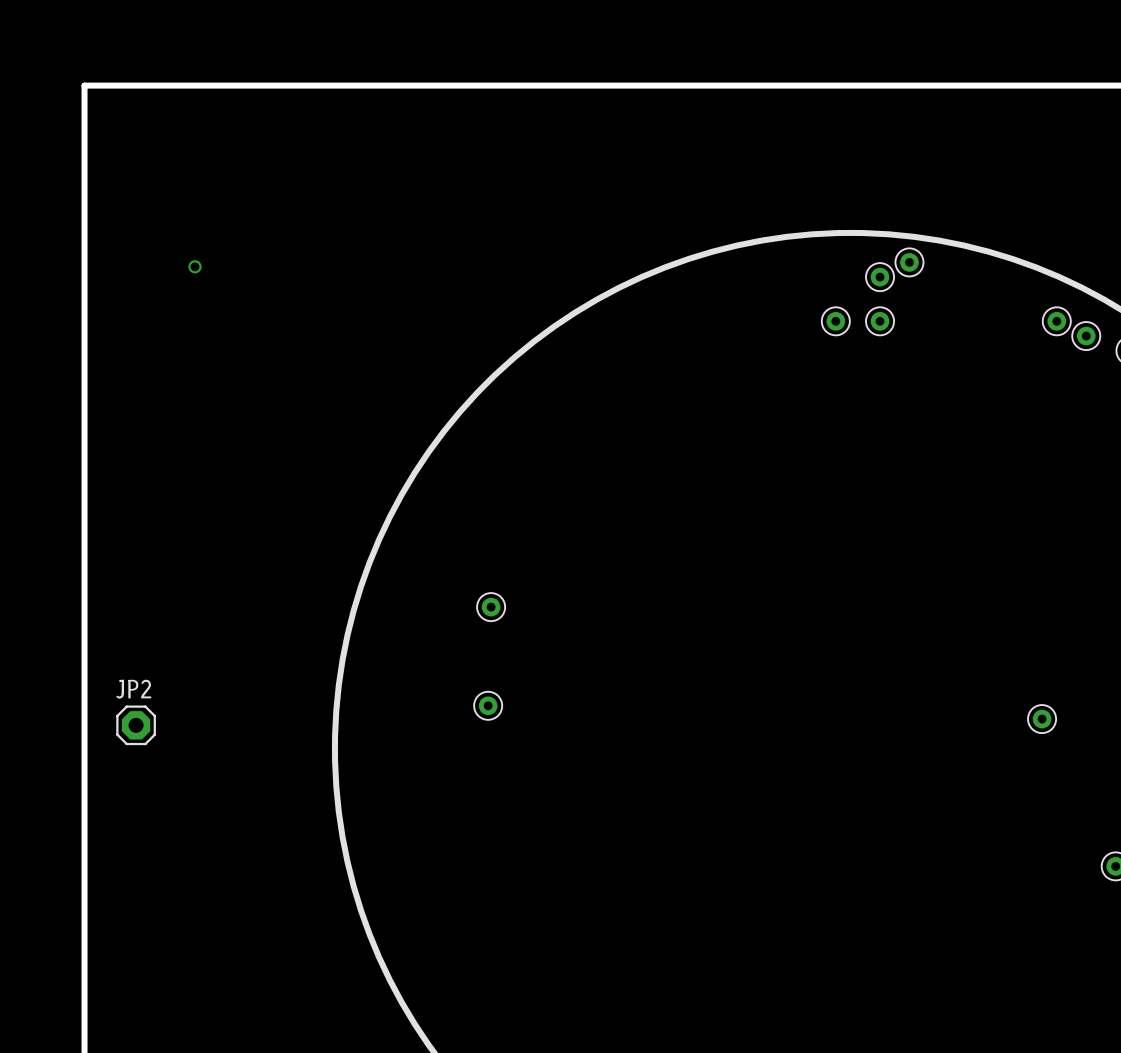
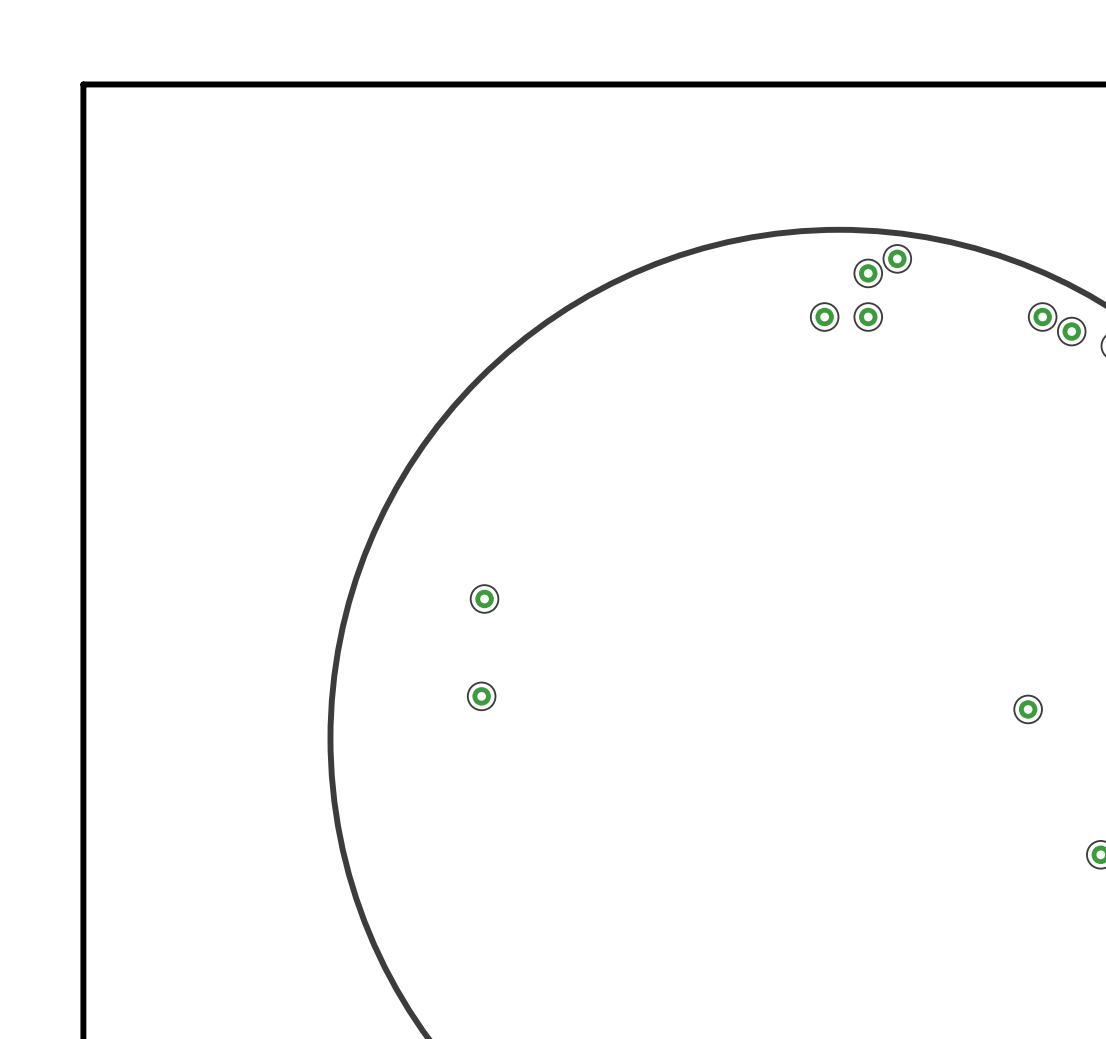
via: (195, 266) -> none
JP2: (136, 725) -> none

